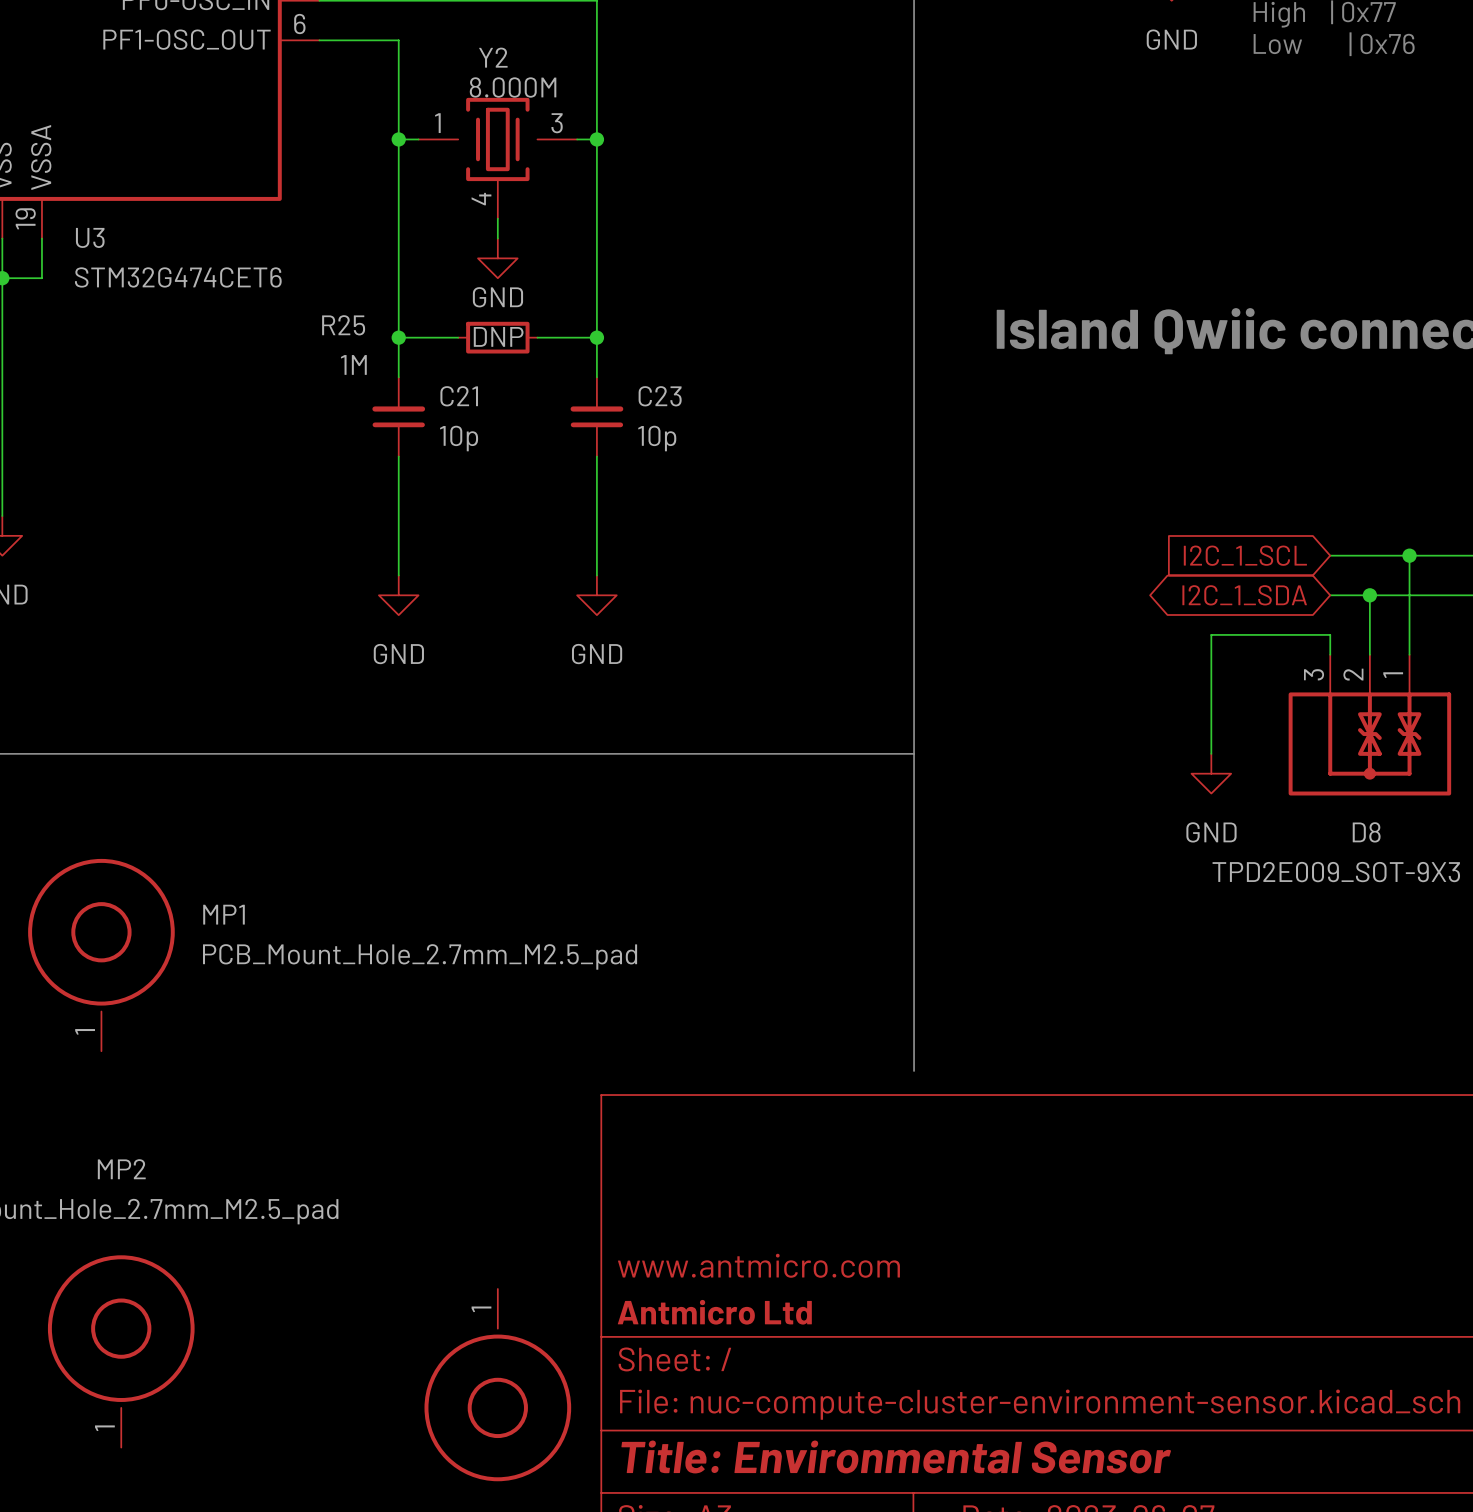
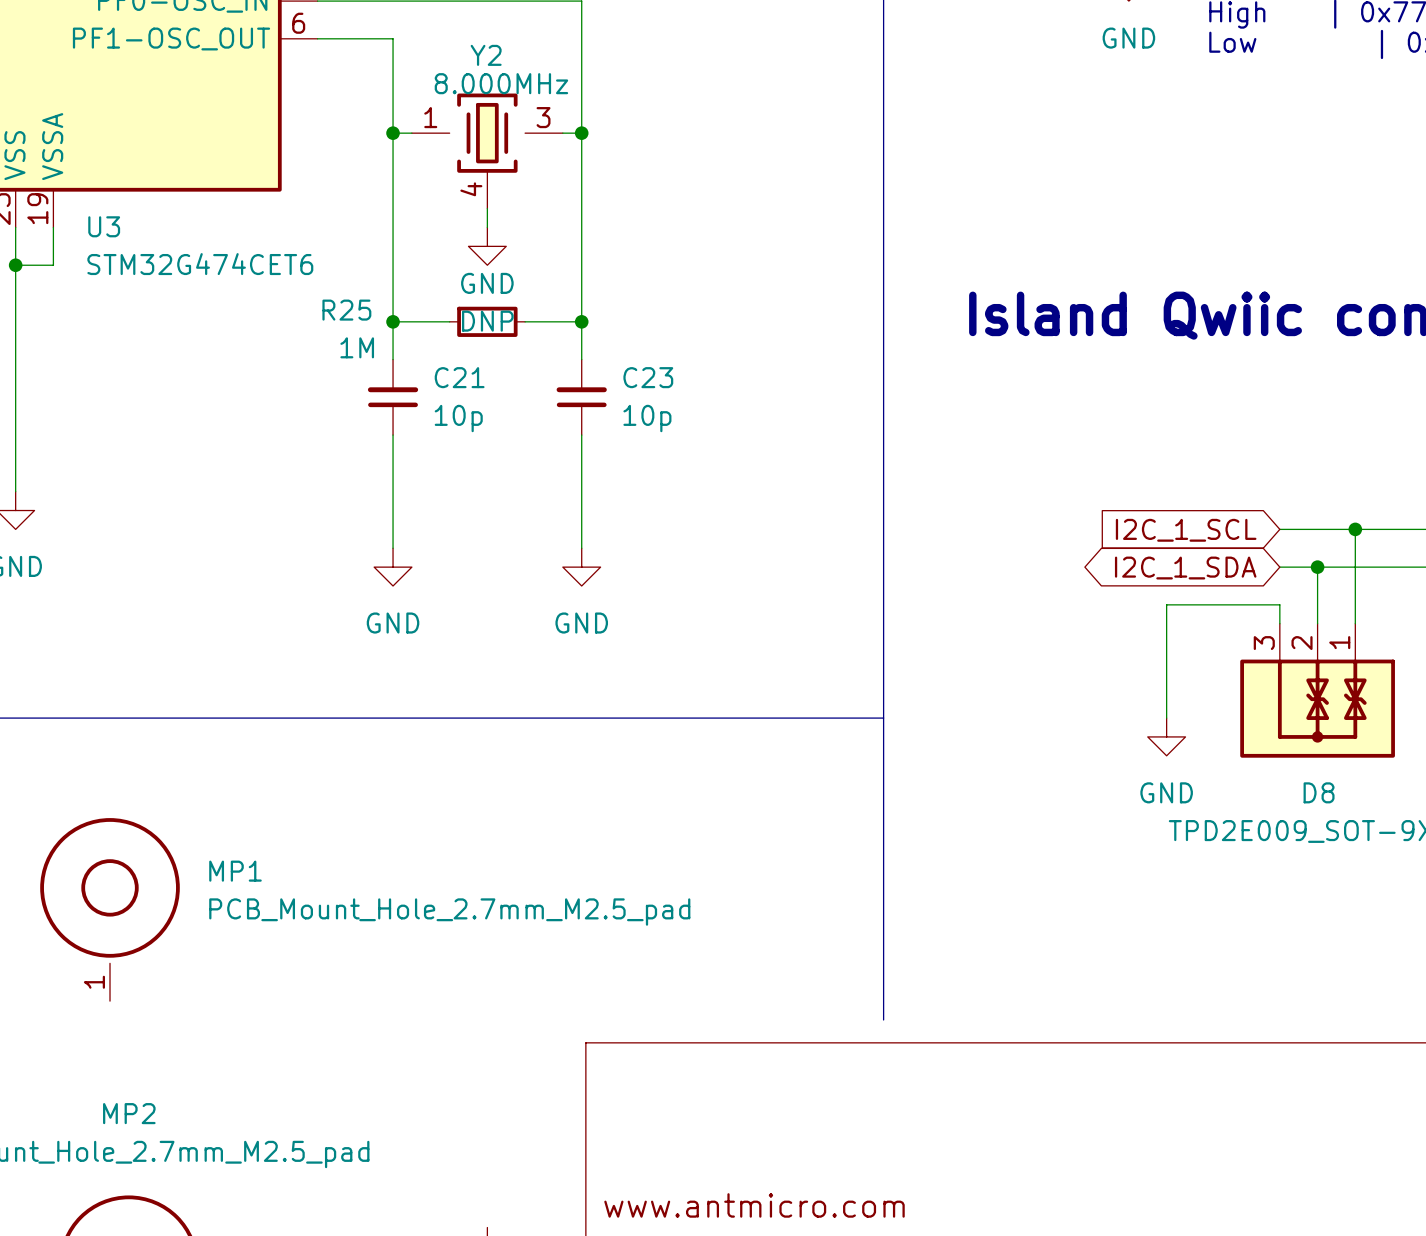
Y2 text: none -> 8.000MHz (501, 83)
Y2 value: 8.000M (513, 87) -> none
Y2 symbol: [418, 97, 578, 219] -> [411, 93, 563, 209]

